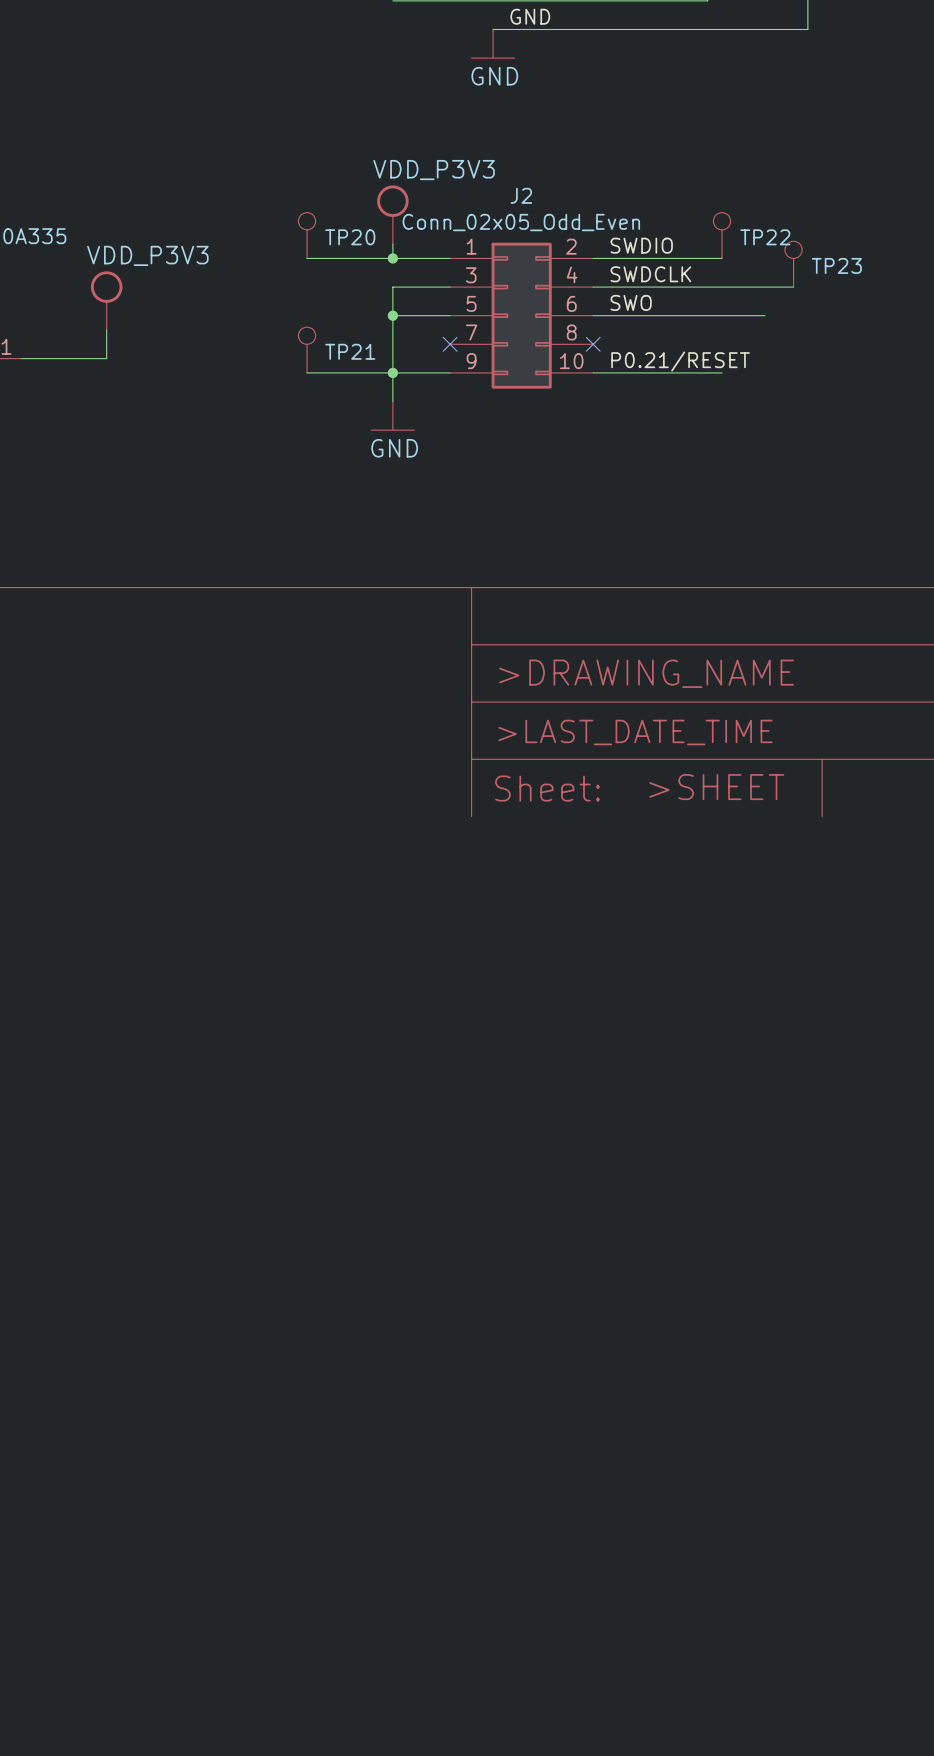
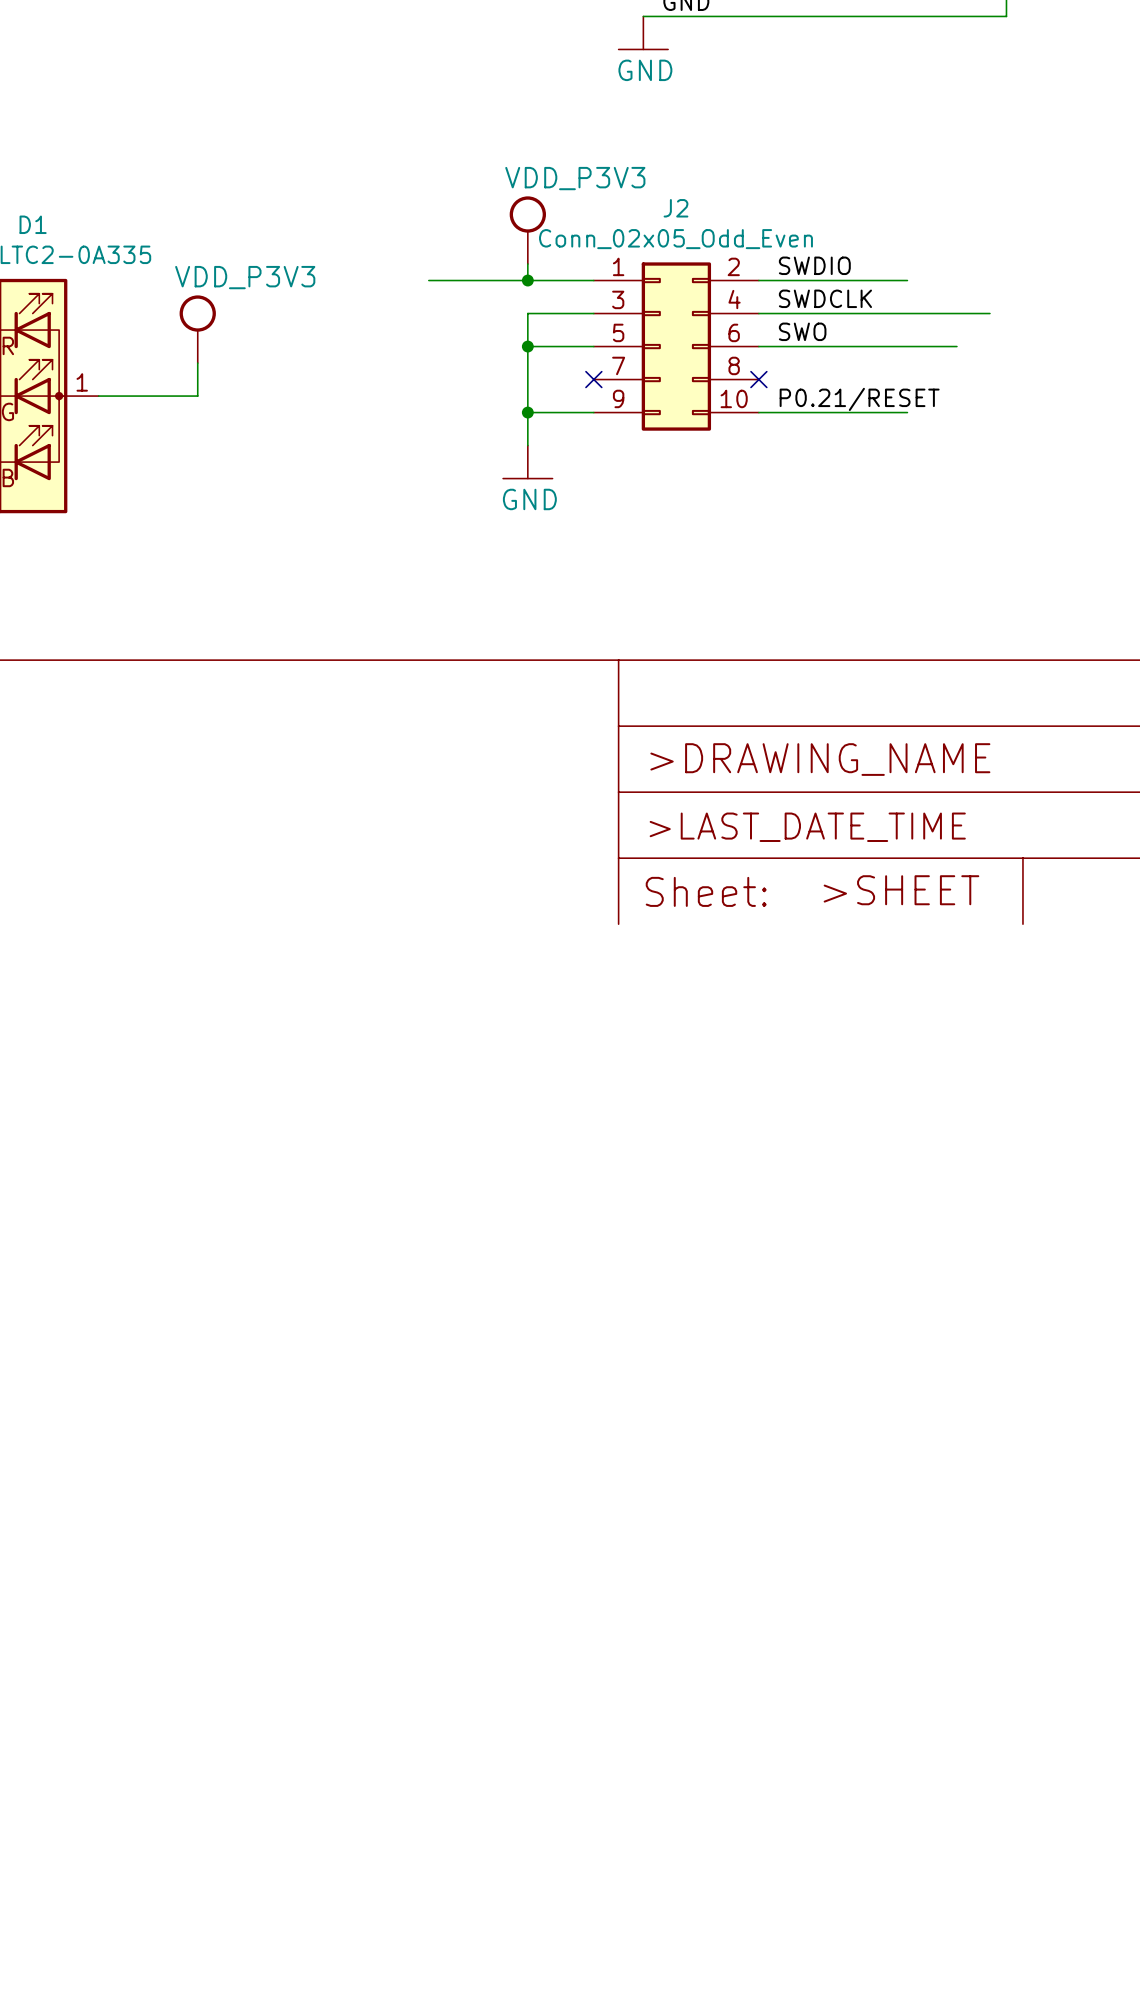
TP20: (307, 235) -> none
TP22: (722, 235) -> none
TP23: (793, 264) -> none
TP21: (307, 350) -> none
wire: (307, 372) (392, 372) -> none

